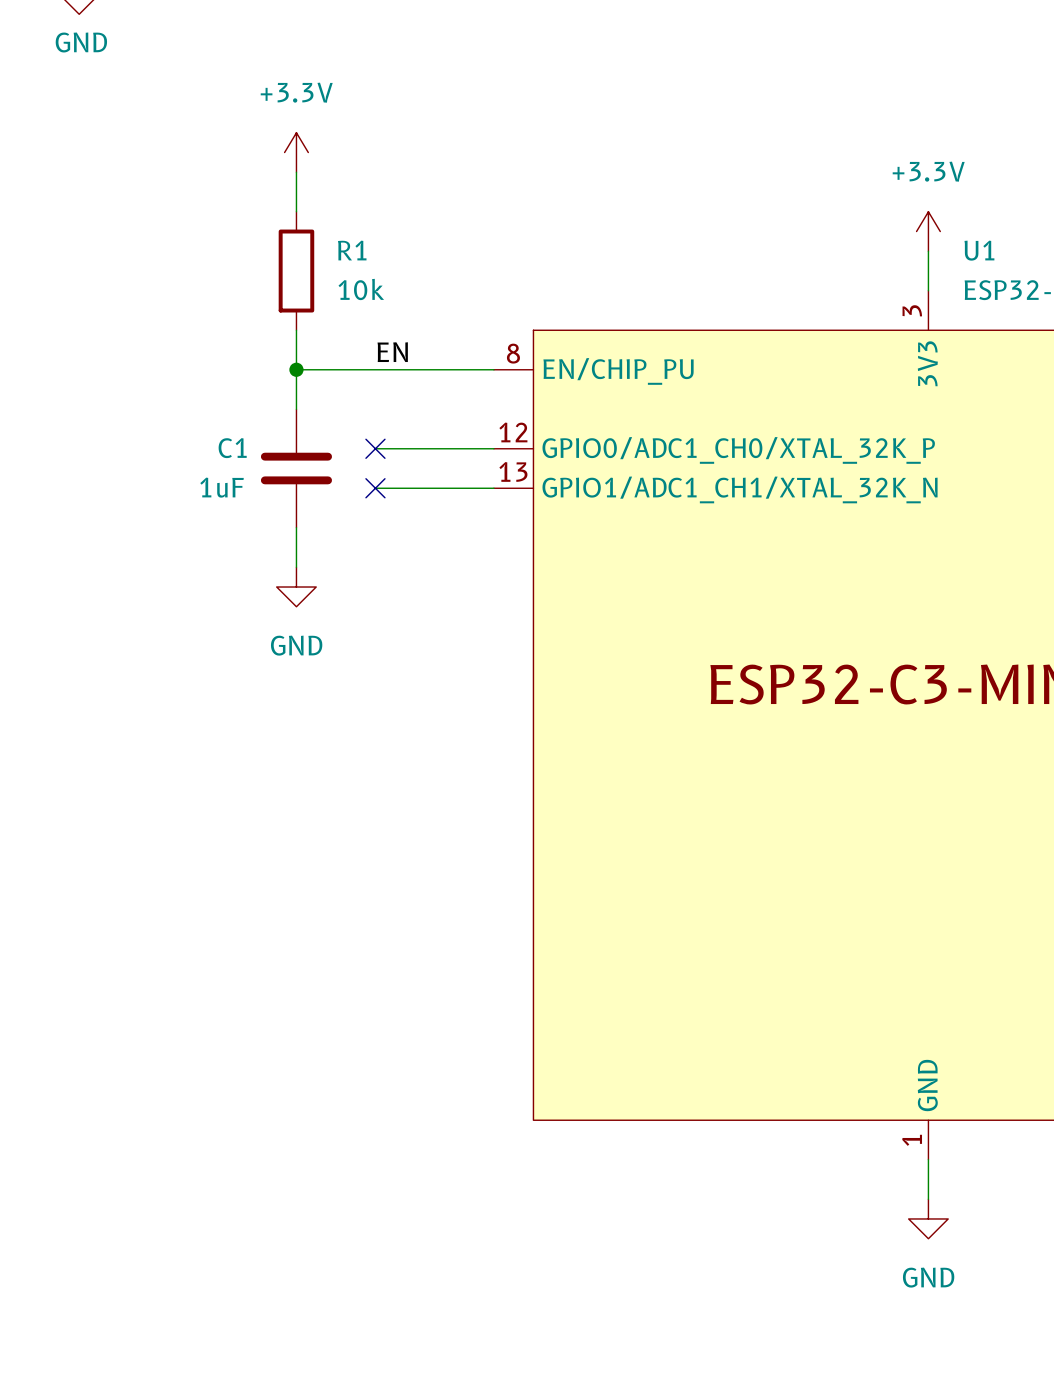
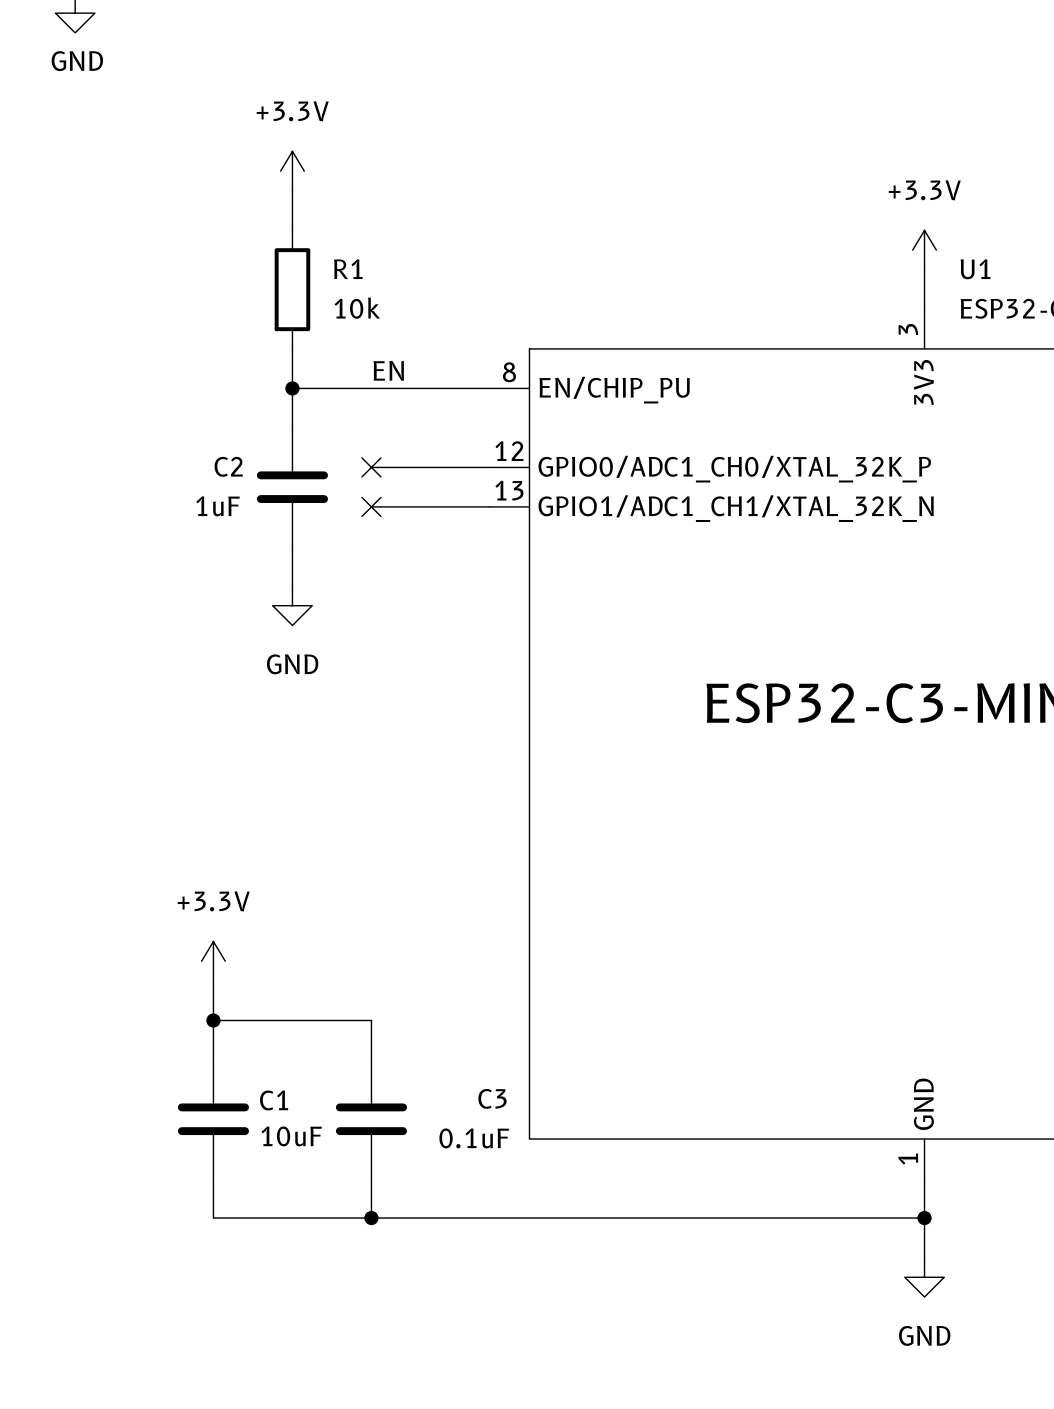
C1 name: C1 (232, 448) -> C2 (228, 466)
power symbol: none -> +3.3V (213, 961)
wire: none -> (213, 981) (213, 1060)
wire: none -> (213, 1020) (371, 1020) (371, 1060)
junction: none -> (213, 1020)
C1: none -> 10uF (213, 1119)
C3: none -> 0.1uF (371, 1119)
wire: none -> (213, 1178) (213, 1218) (924, 1218) (924, 1257)
wire: none -> (371, 1178) (371, 1218)
junction: none -> (371, 1218)
junction: none -> (924, 1218)
power symbol position: GND (928, 1218) -> GND (924, 1277)

